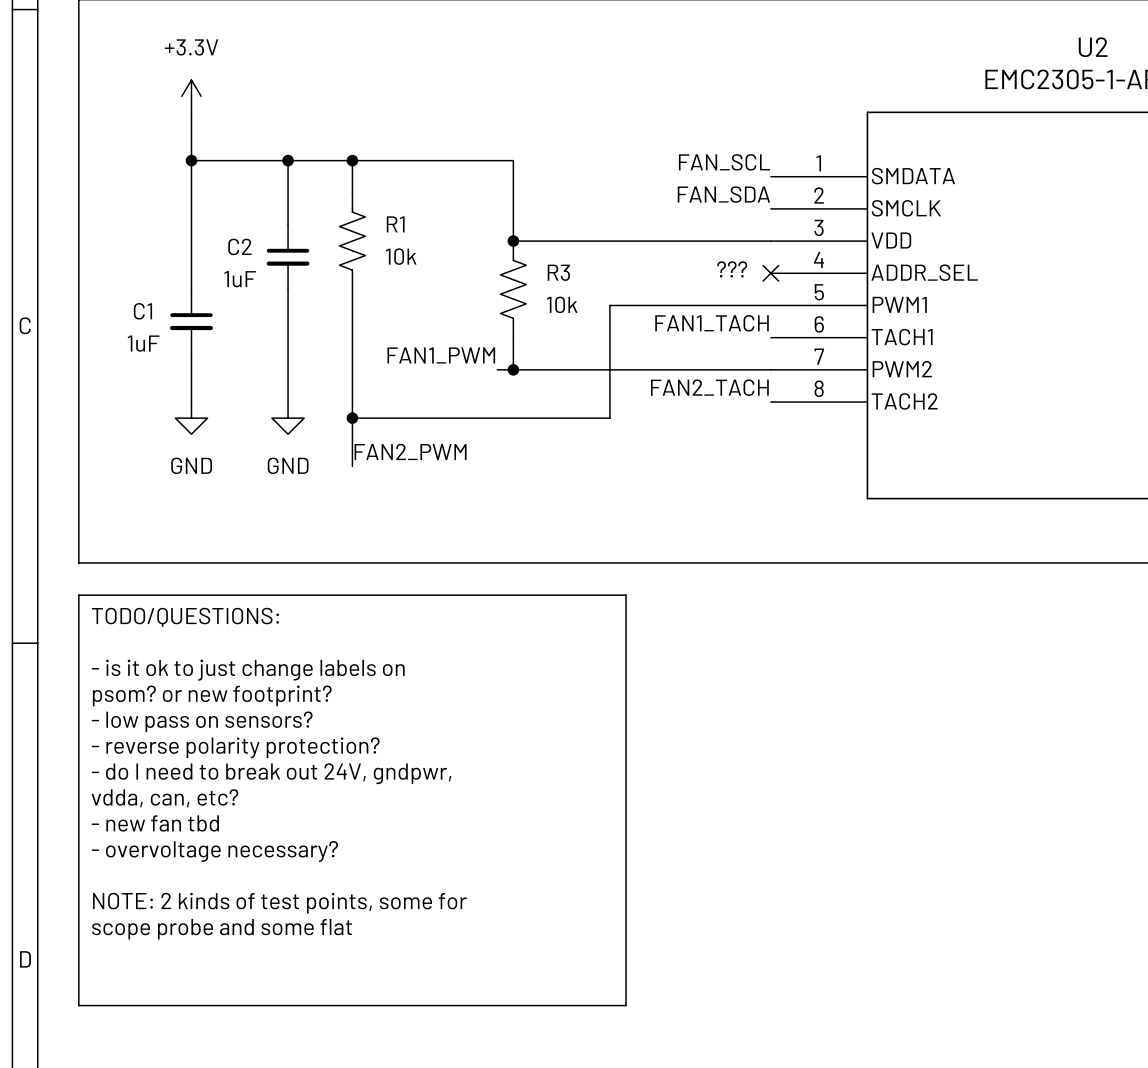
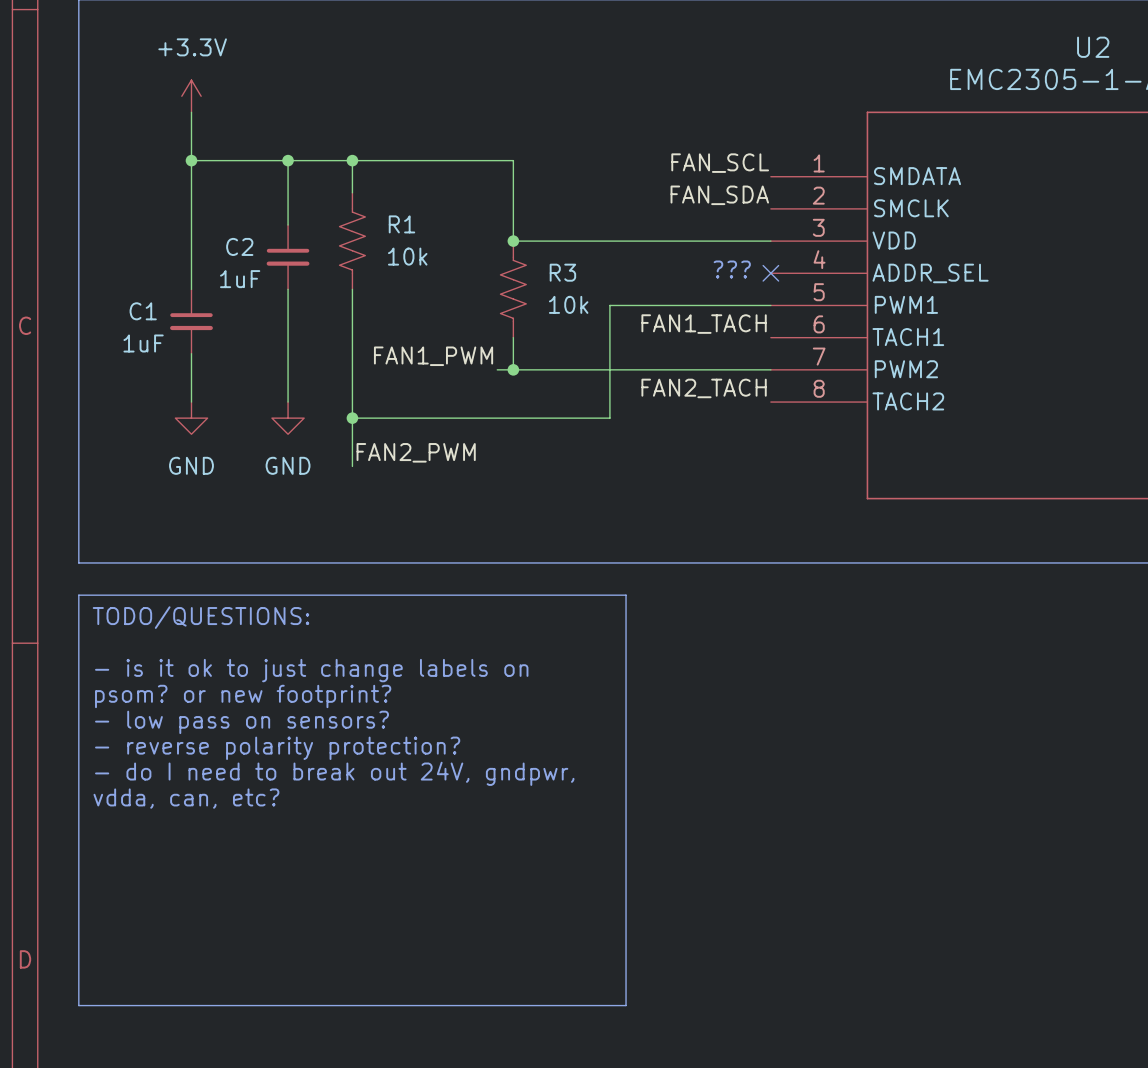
text: - new fan tbd (155, 823) -> none
text: - overvoltage necessary? (214, 851) -> none
text: NOTE: 2 kinds of test points, some for (279, 903) -> none
text: scope probe and some flat (222, 929) -> none

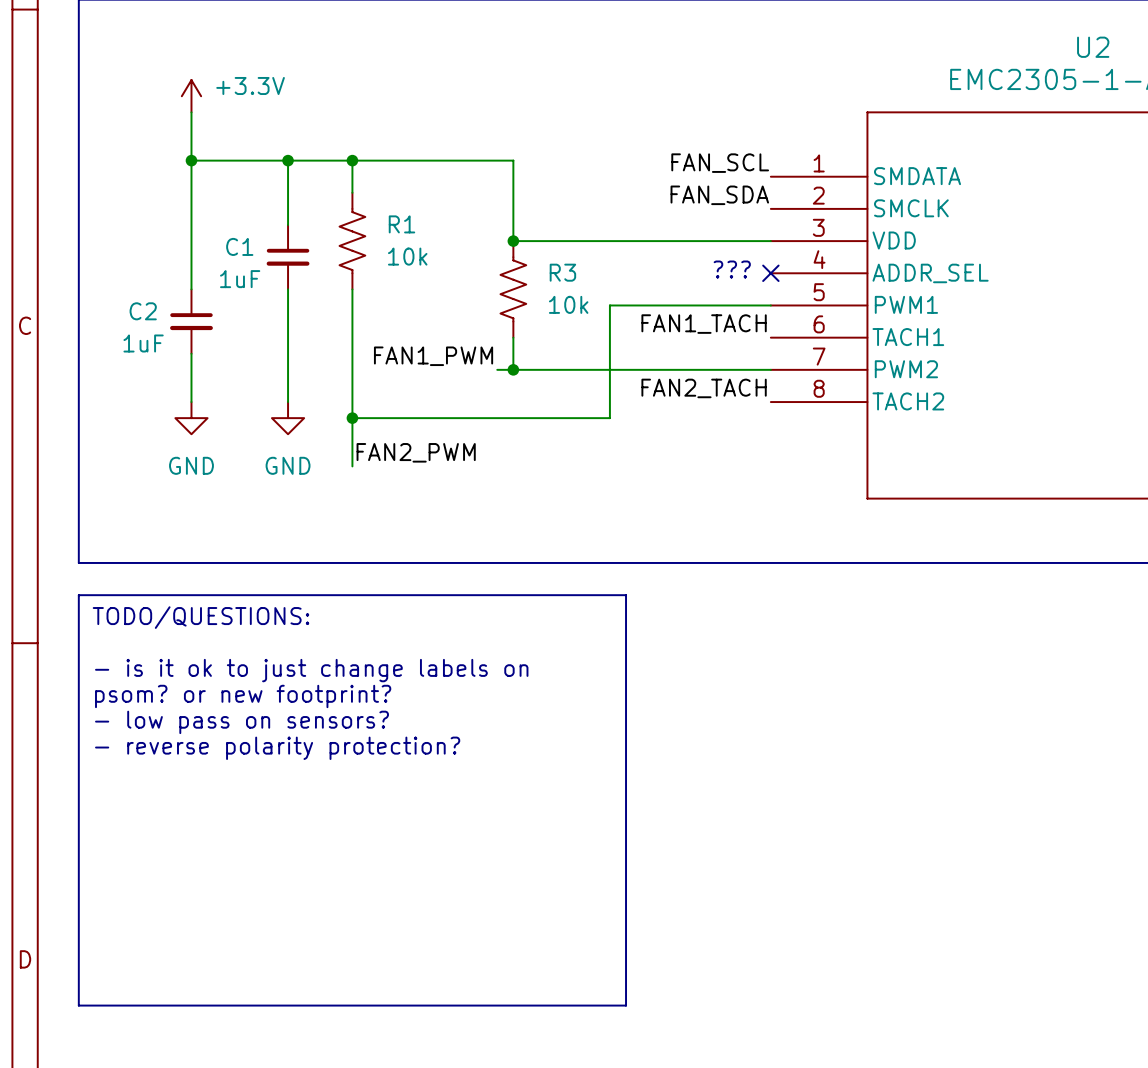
power symbol text position: +3.3V (192, 47) -> +3.3V (250, 85)
C2 name: C2 (239, 246) -> C1 (239, 246)
C1 name: C1 (143, 311) -> C2 (143, 311)
text: - do I need to break out 24V, gndpwr, (334, 773) -> none
text: vdda, can, etc? (186, 798) -> none

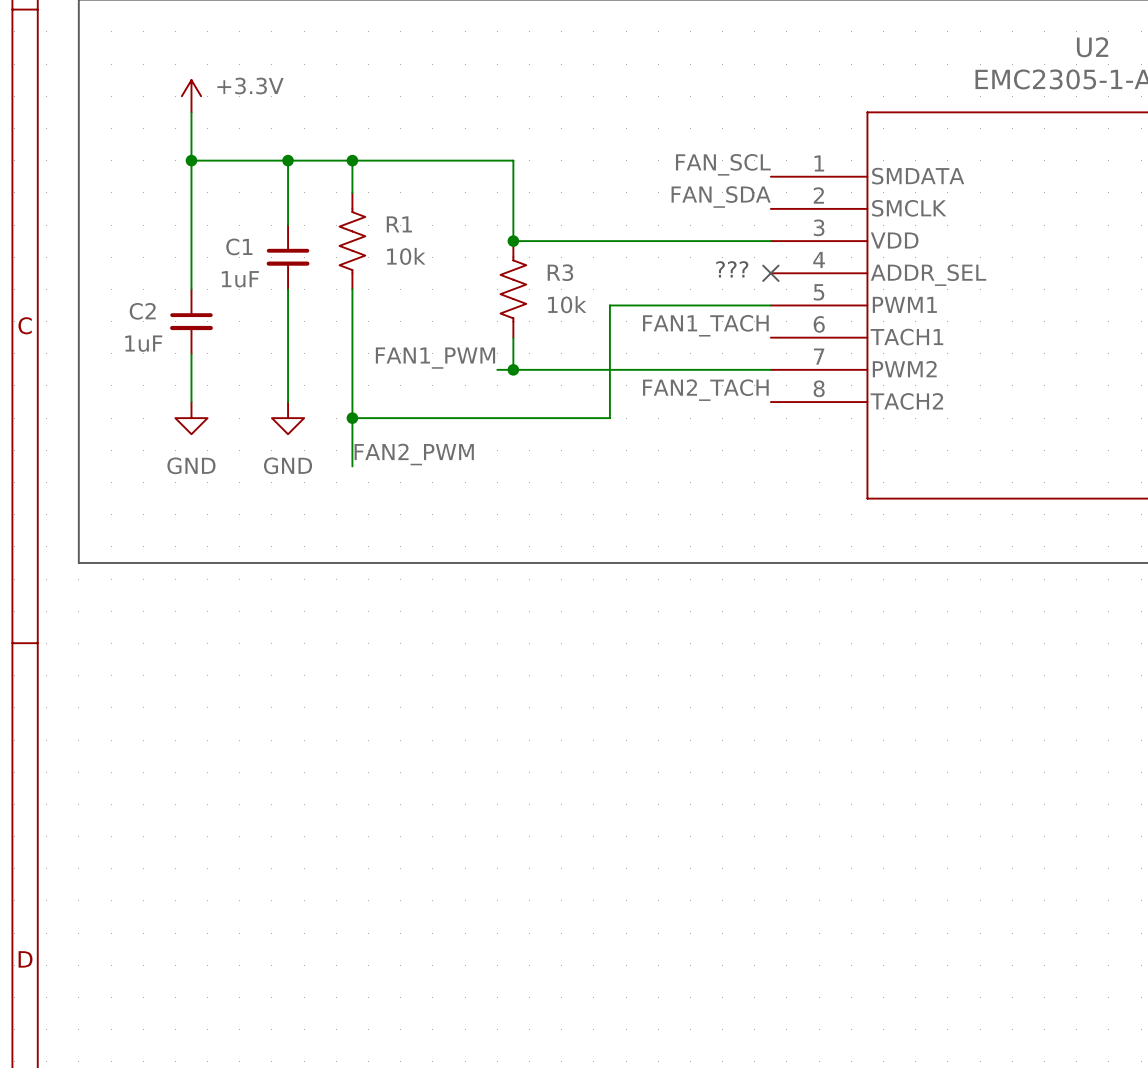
line: (78, 595) (626, 595) (626, 1005) (78, 1005) (78, 595) -> none
text: TODO/QUESTIONS: (200, 617) -> none
text: - is it ok to just change labels on (311, 670) -> none
text: psom? or new footprint? (243, 696) -> none
text: - low pass on sensors? (241, 722) -> none
text: - reverse polarity protection? (277, 748) -> none

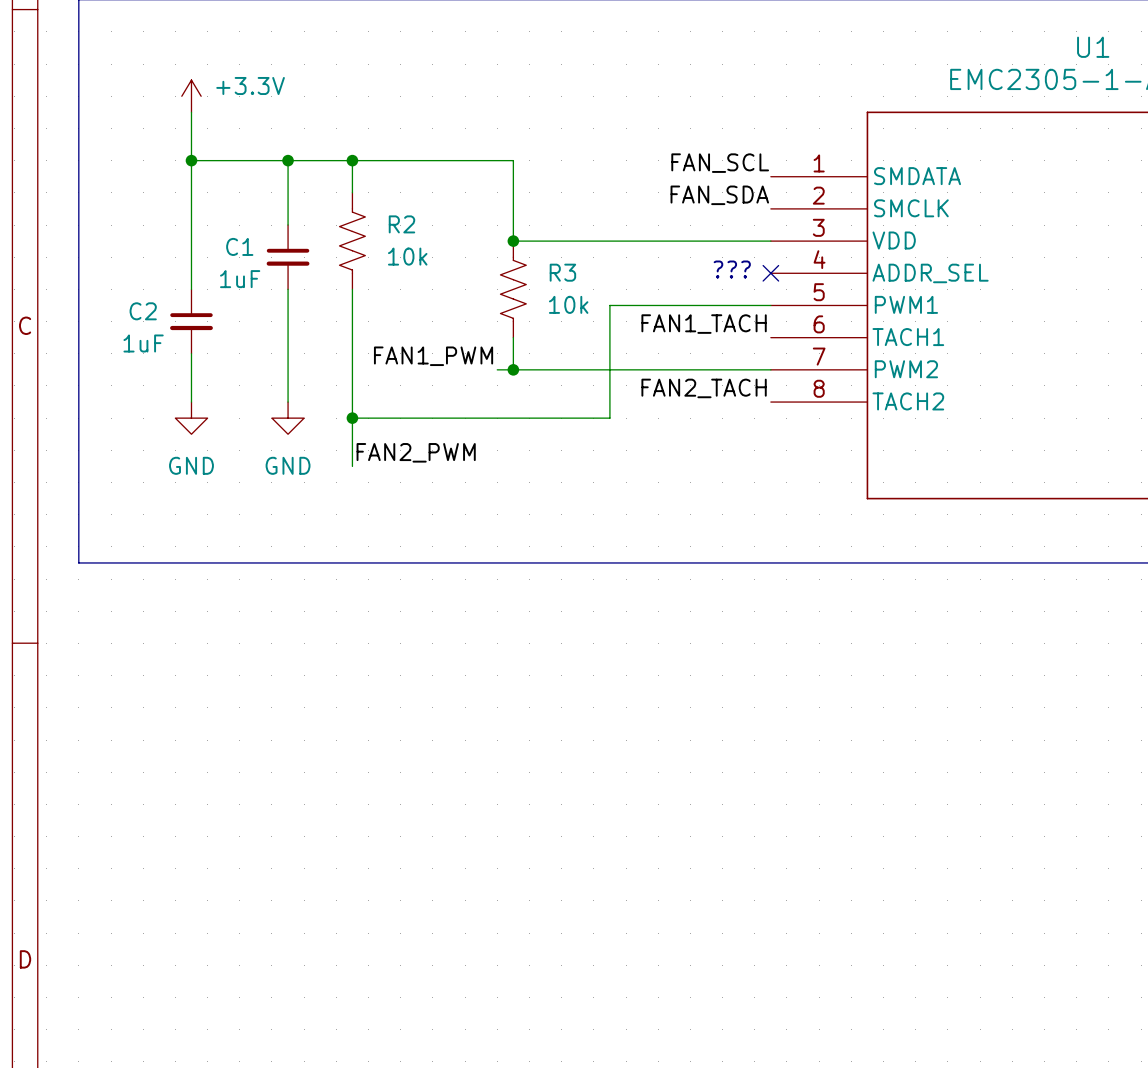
U2 name: U2 (1092, 47) -> U1 (1093, 47)
R1 name: R1 (399, 224) -> R2 (401, 224)

